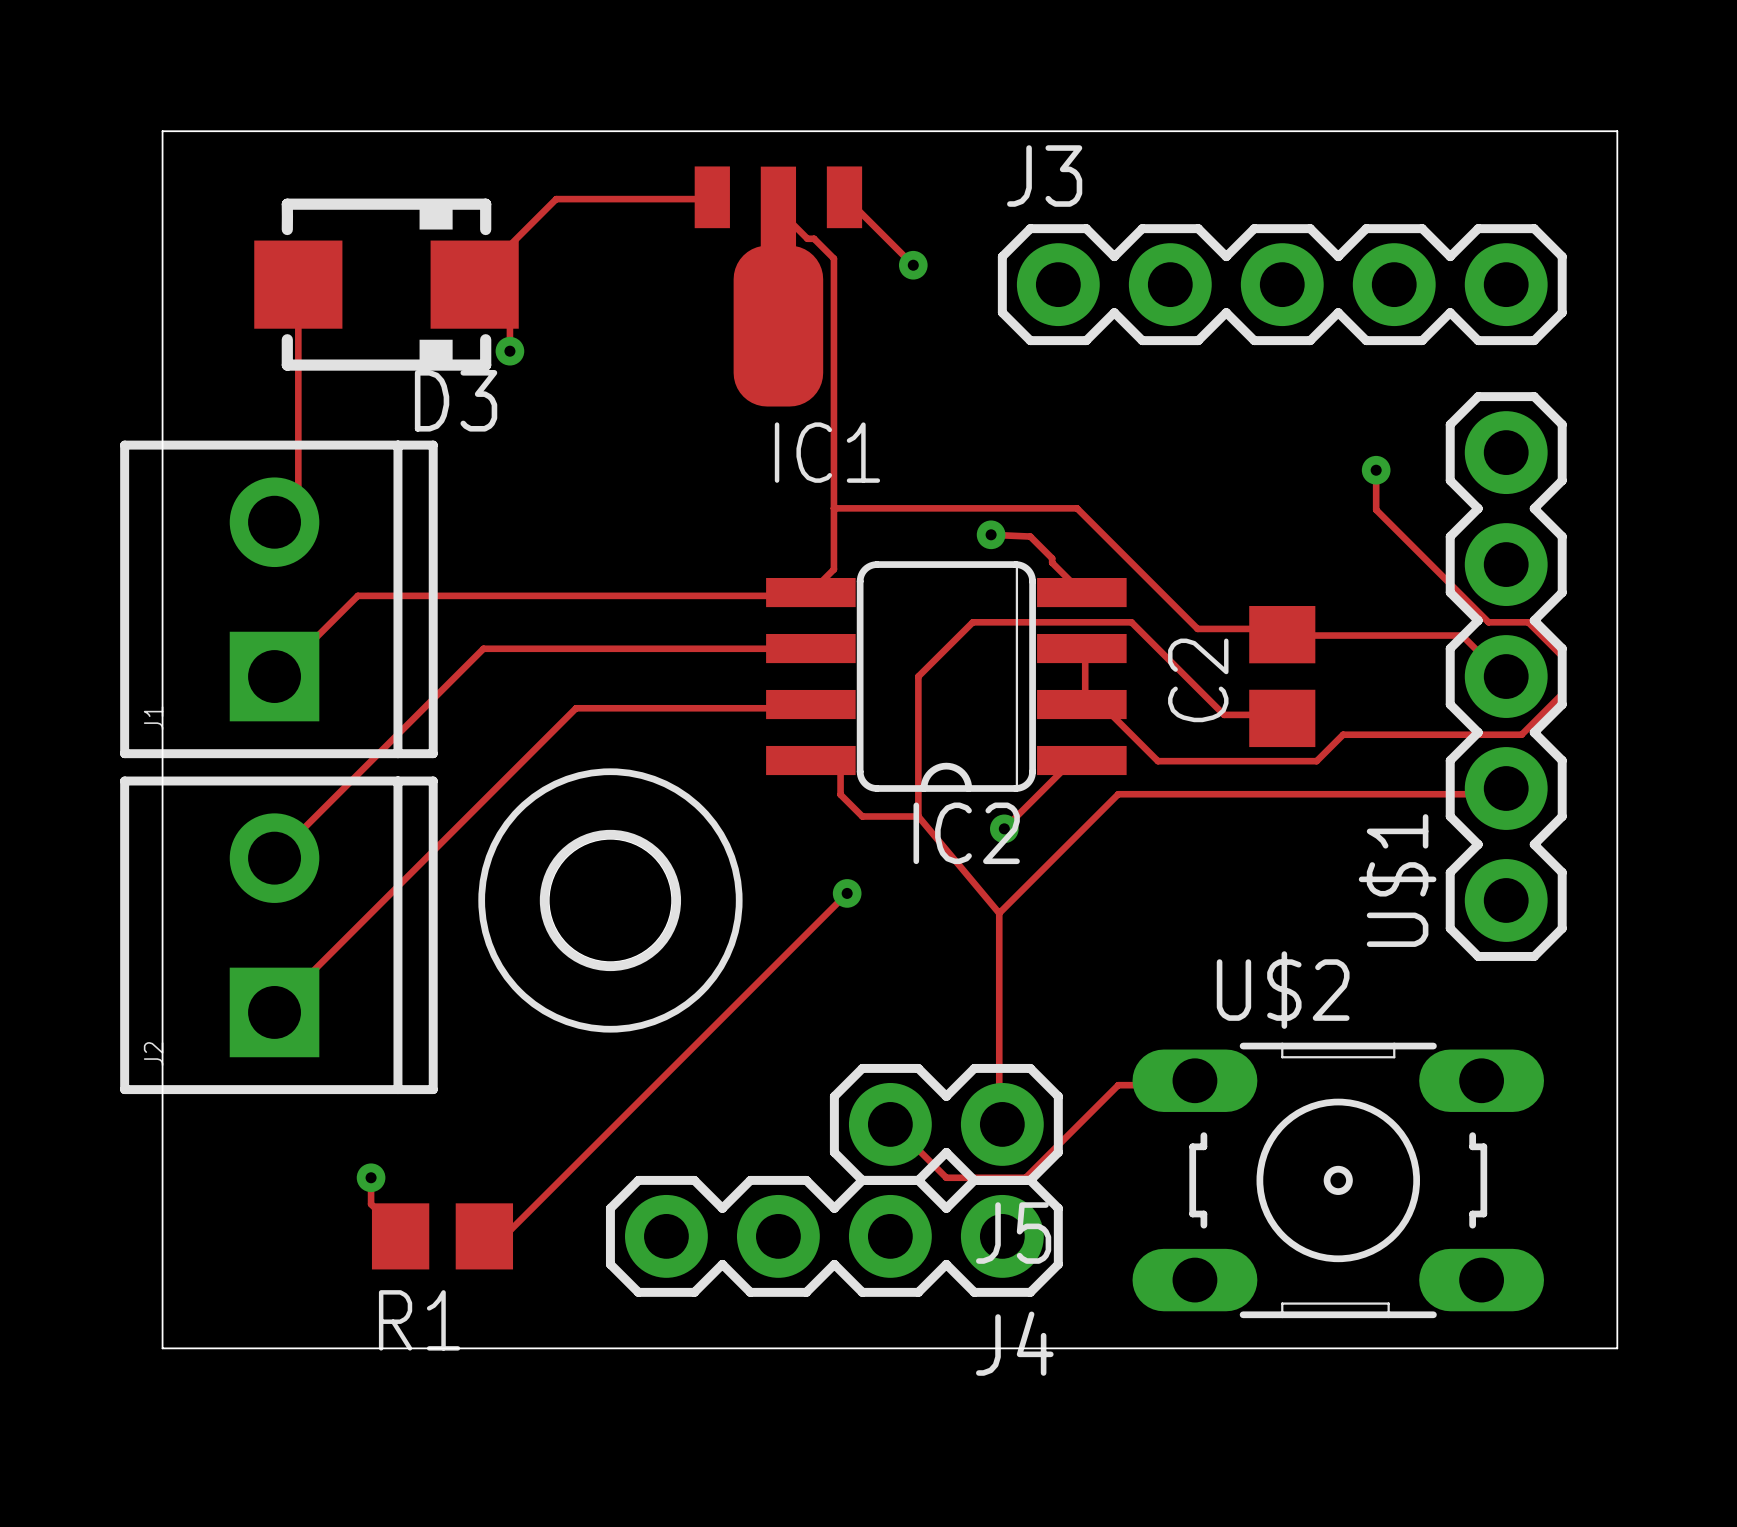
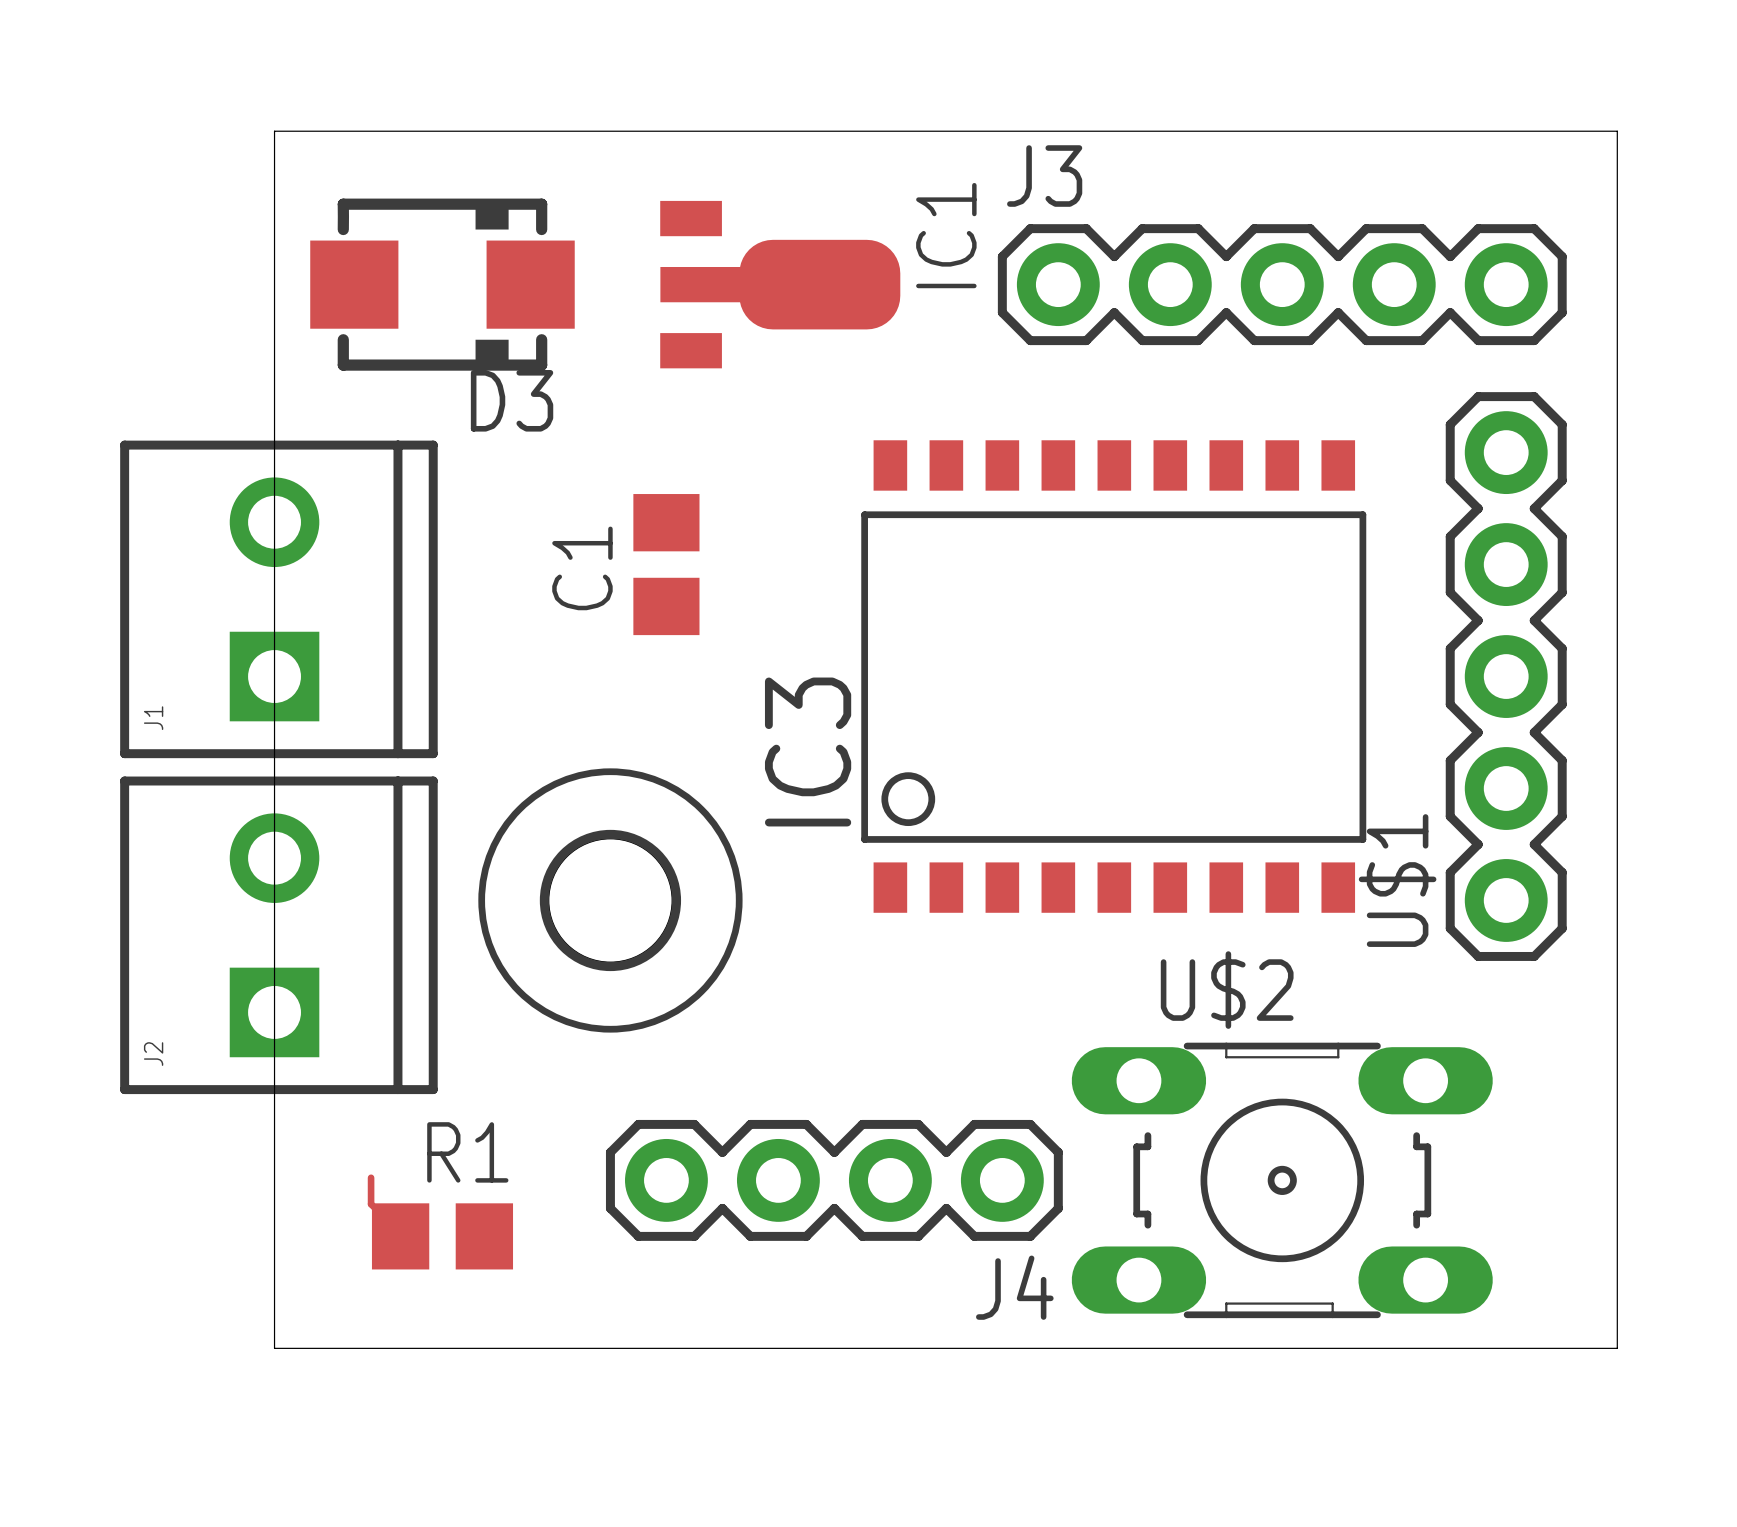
board edge: (274, 131) (162, 131) (162, 1348) (274, 1348) -> (274, 131) (274, 1348)
track: (712, 197) (708, 199) (556, 199) (476, 278) (474, 284) (509, 318) (509, 351) -> none
track: (844, 197) (913, 265) -> none
track: (778, 208) (807, 238) (814, 238) (833, 258) (833, 569) (807, 595) (357, 595) (278, 675) (274, 676) -> none
via: (913, 265) -> none
track: (298, 284) (298, 496) (274, 522) -> none
D3 position: (386, 284) -> (442, 284)
IC1 rotation: 0° (778, 286) -> 90° counterclockwise (780, 284)
via: (509, 351) -> none
track: (1376, 470) (1376, 509) (1488, 622) (1528, 622) (1561, 655) (1561, 695) (1521, 734) (1343, 734) (1316, 761) (1157, 761) (1105, 708) (1085, 708) (1081, 704) (1085, 701) (1085, 648) (1081, 648) -> none
via: (1376, 470) -> none
track: (833, 508) (1077, 508) (1197, 628) (1276, 628) (1283, 635) (1462, 635) (1501, 675) (1506, 676) -> none
track: (991, 534) (1030, 536) (1052, 558) (1052, 562) (1081, 592) -> none
via: (991, 534) -> none
C1: none -> (666, 564)
track: (810, 648) (483, 648) (274, 858) -> none
IC2: (946, 676) -> none
IC3: none -> (1113, 676)
C2: (1282, 676) -> none
track: (810, 704) (807, 708) (576, 708) (271, 1012) (274, 1012) -> none
track: (1282, 718) (1276, 714) (1224, 714) (1131, 622) (972, 622) (918, 676) (918, 816) -> none
track: (840, 754) (840, 794) (862, 816) (918, 816) -> none
track: (1081, 760) (1078, 754) (1004, 828) -> none
track: (1506, 788) (1501, 794) (1118, 794) (999, 913) -> none
track: (918, 816) (999, 913) -> none
via: (1004, 828) -> none
track: (847, 893) (509, 1230) (490, 1230) (484, 1236) -> none
via: (847, 893) -> none
track: (999, 913) (999, 1118) (1002, 1124) -> none
U$2 footprint: [1132, 1042, 1545, 1319] -> [1071, 1042, 1493, 1319]
track: (1194, 1080) (1191, 1085) (1118, 1085) (1025, 1177) (946, 1177) (893, 1124) (890, 1124) -> none
J5: (946, 1124) -> none
via: (371, 1177) -> none
J4 position: (834, 1236) -> (834, 1180)
R1 name position: R1 (419, 1320) -> R1 (467, 1152)

